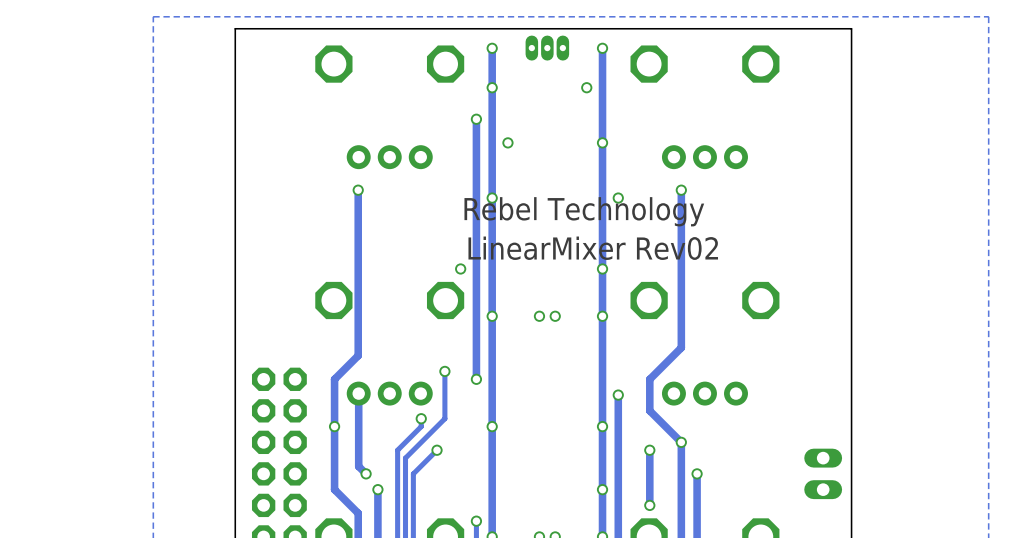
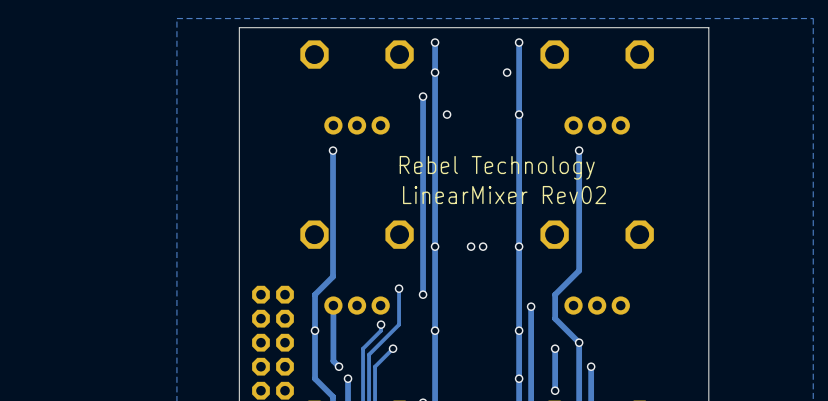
part: (547, 48) -> none
via: (492, 198) -> none
via: (618, 198) -> none
via: (460, 268) -> none
via: (602, 268) -> none
part: (823, 473) -> none

